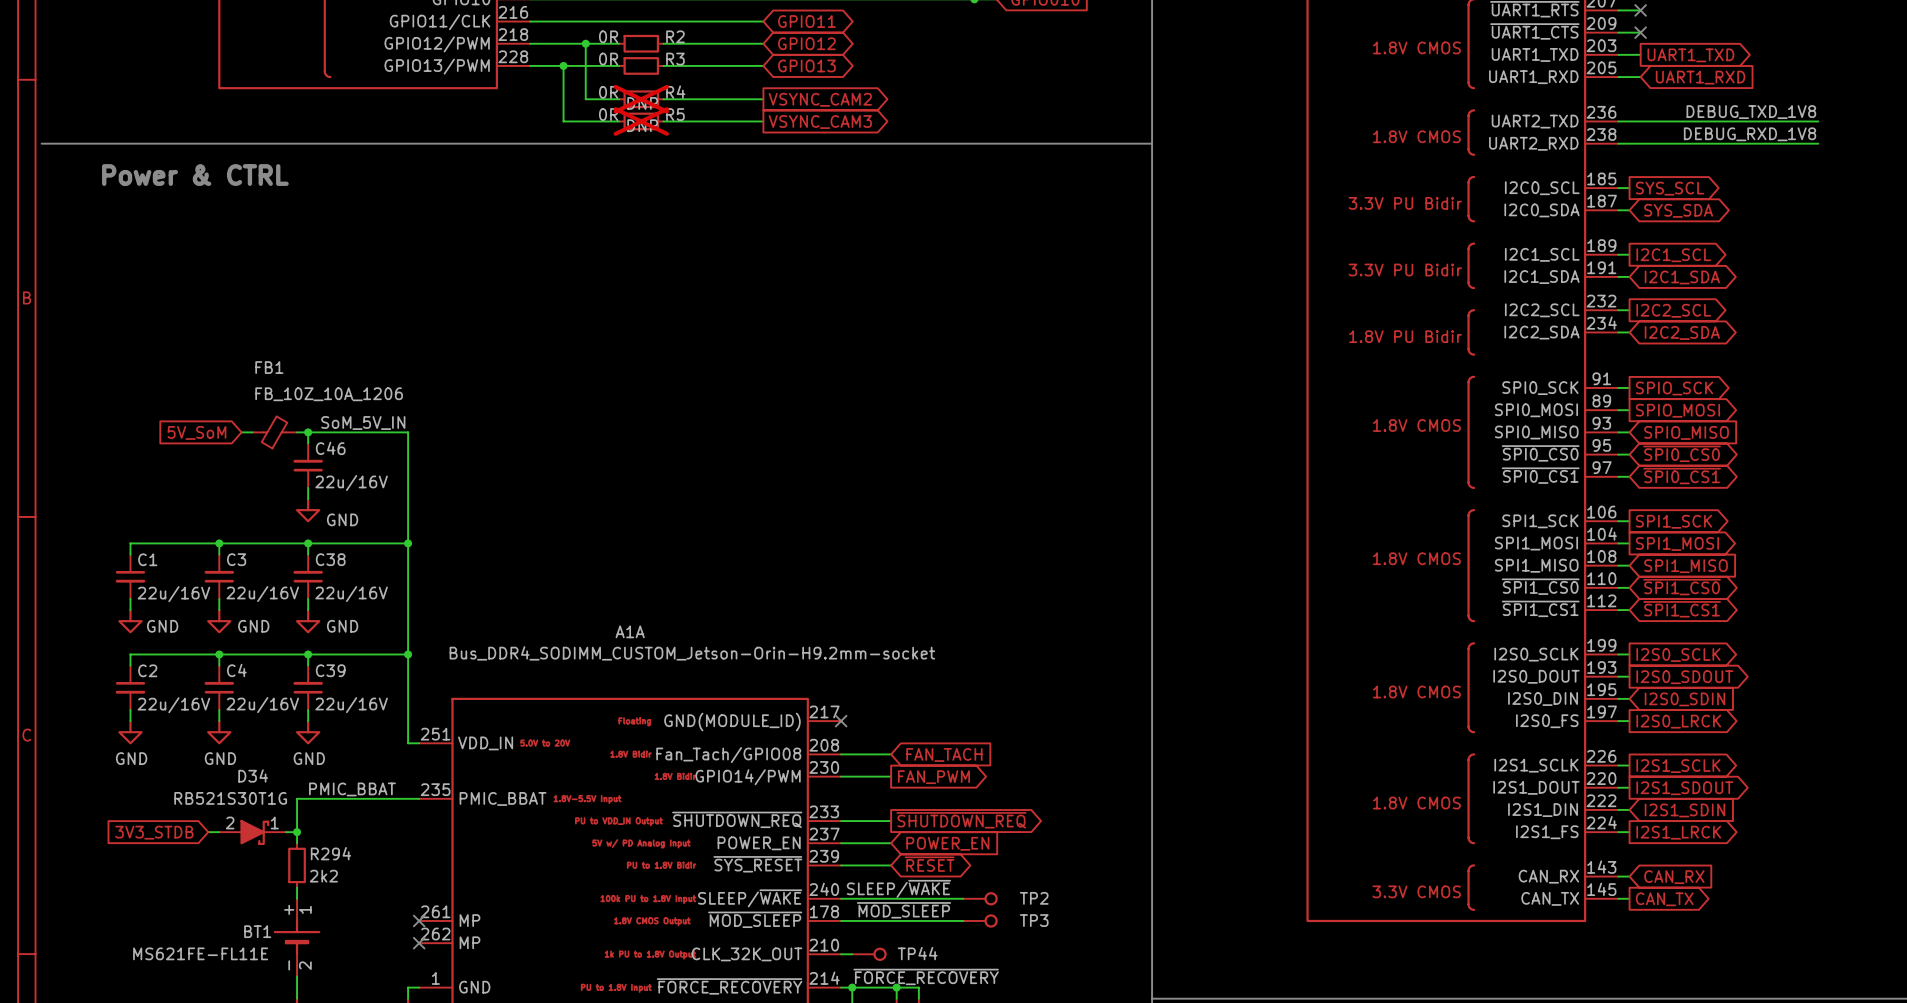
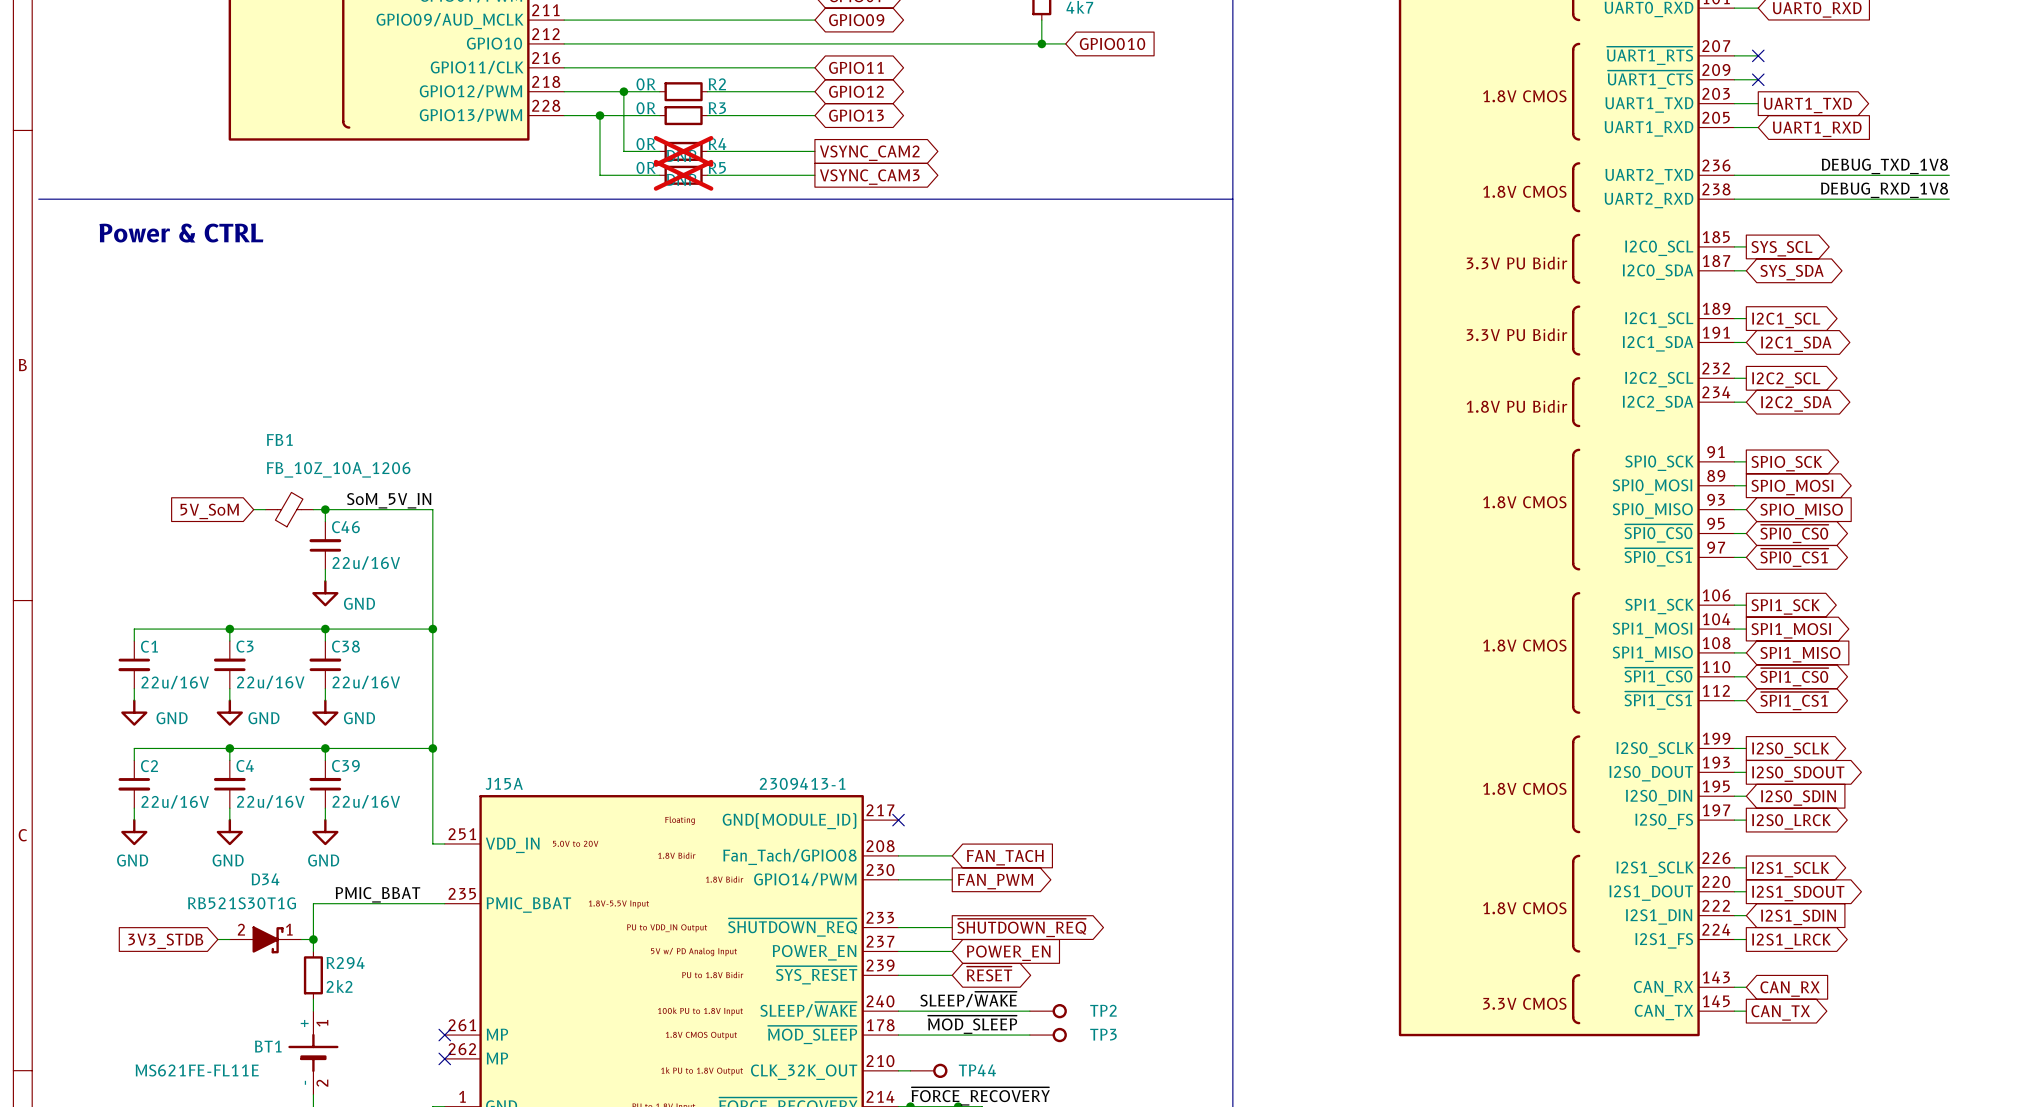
A1A name: A1A (630, 631) -> J15A (504, 783)
A1A value: Bus_DDR4_SODIMM_CUSTOM_Jetson-Orin-H9.2mm-socket (692, 653) -> none
A1A text: none -> 2309413-1 (802, 783)

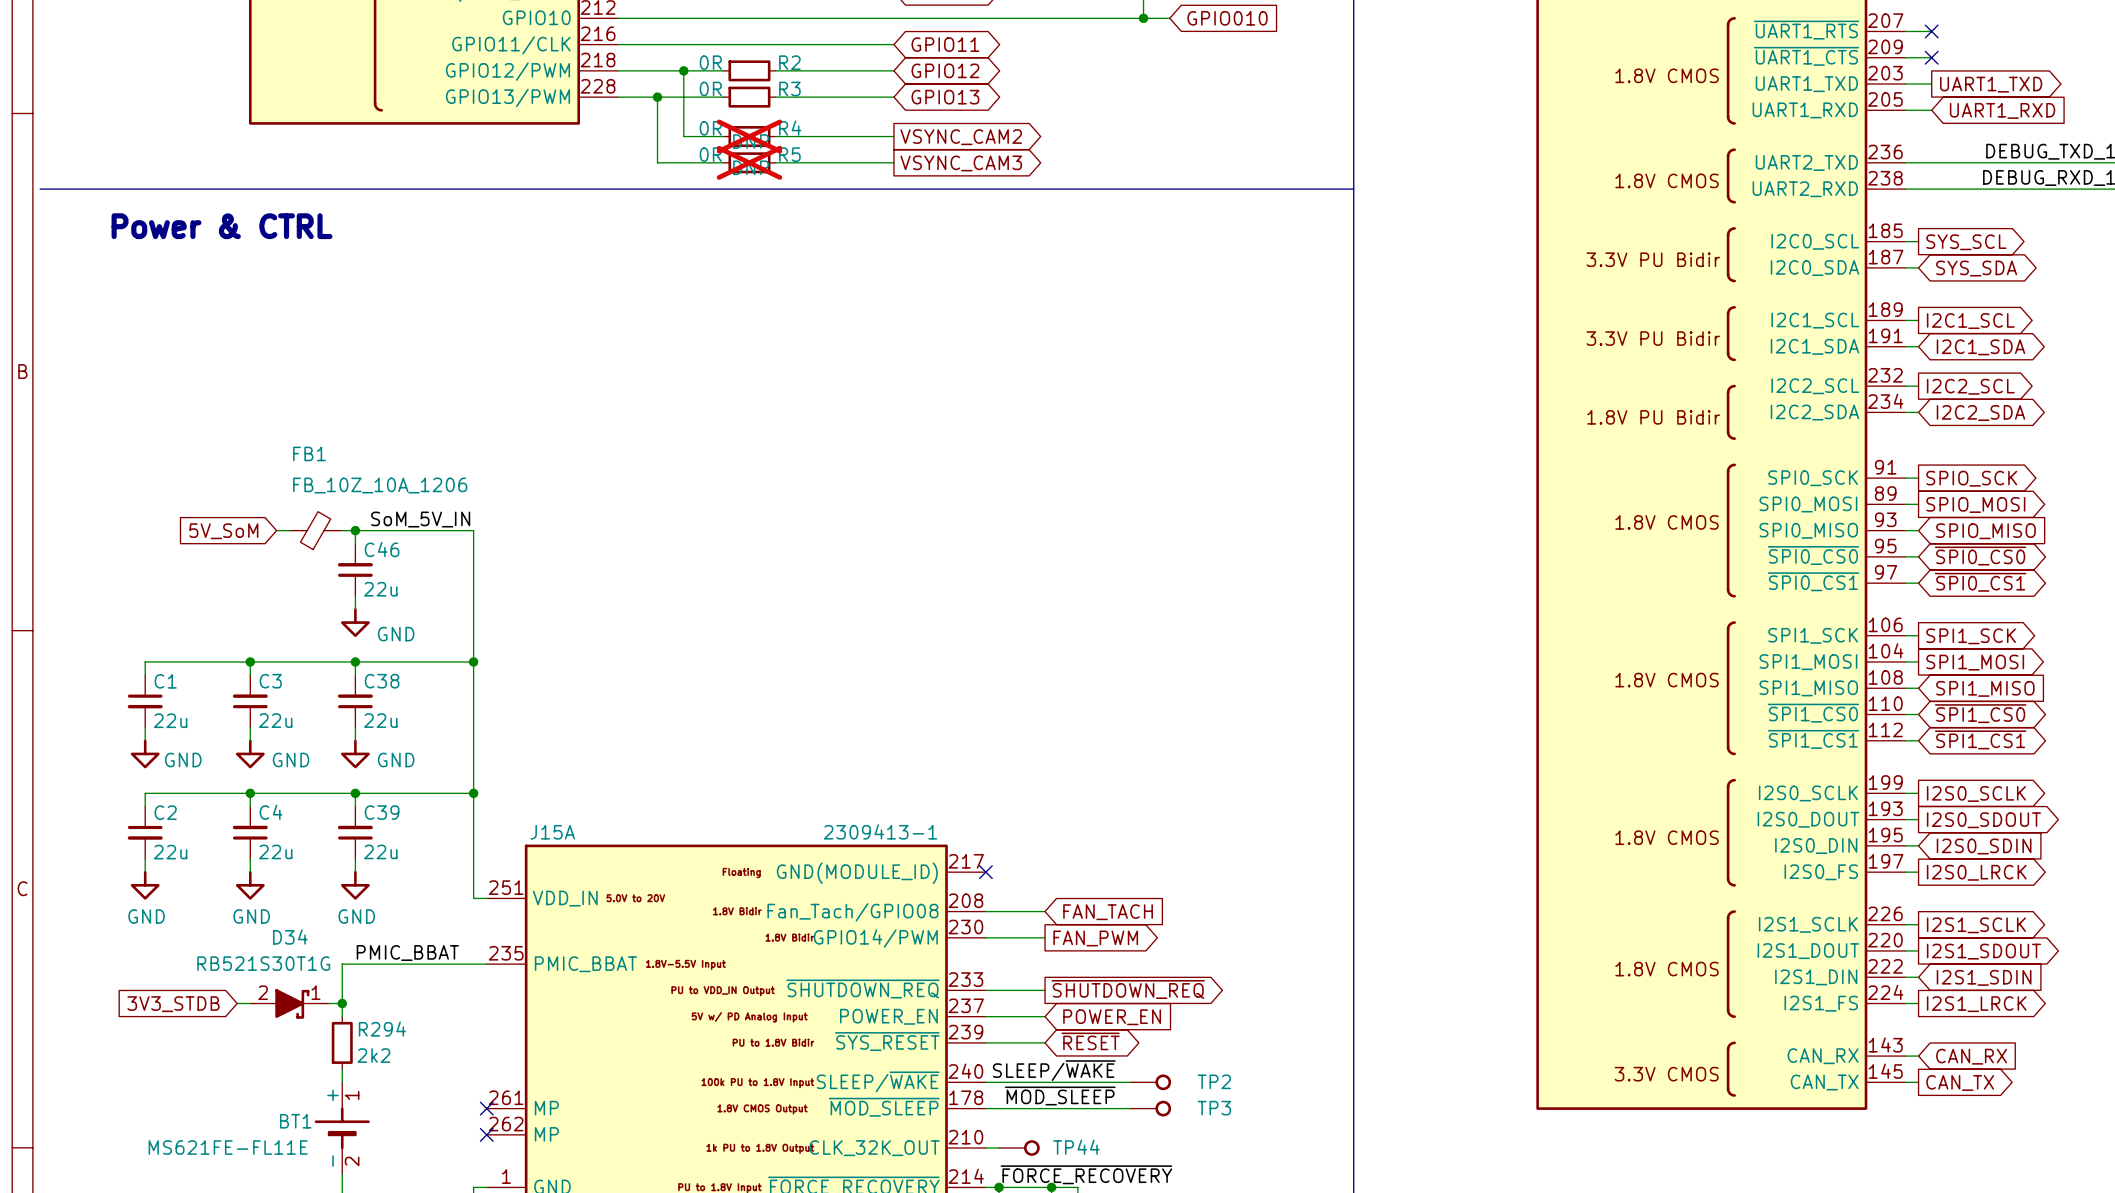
C46 text: 22u/16V (366, 563) -> 22u (380, 589)
C1 text: 22u/16V (175, 682) -> 22u (170, 720)
C3 text: 22u/16V (270, 682) -> 22u (275, 720)
C38 text: 22u/16V (366, 682) -> 22u (380, 720)
C2 text: 22u/16V (175, 801) -> 22u (170, 852)
C4 text: 22u/16V (270, 801) -> 22u (275, 851)
C39 text: 22u/16V (366, 801) -> 22u (380, 851)

